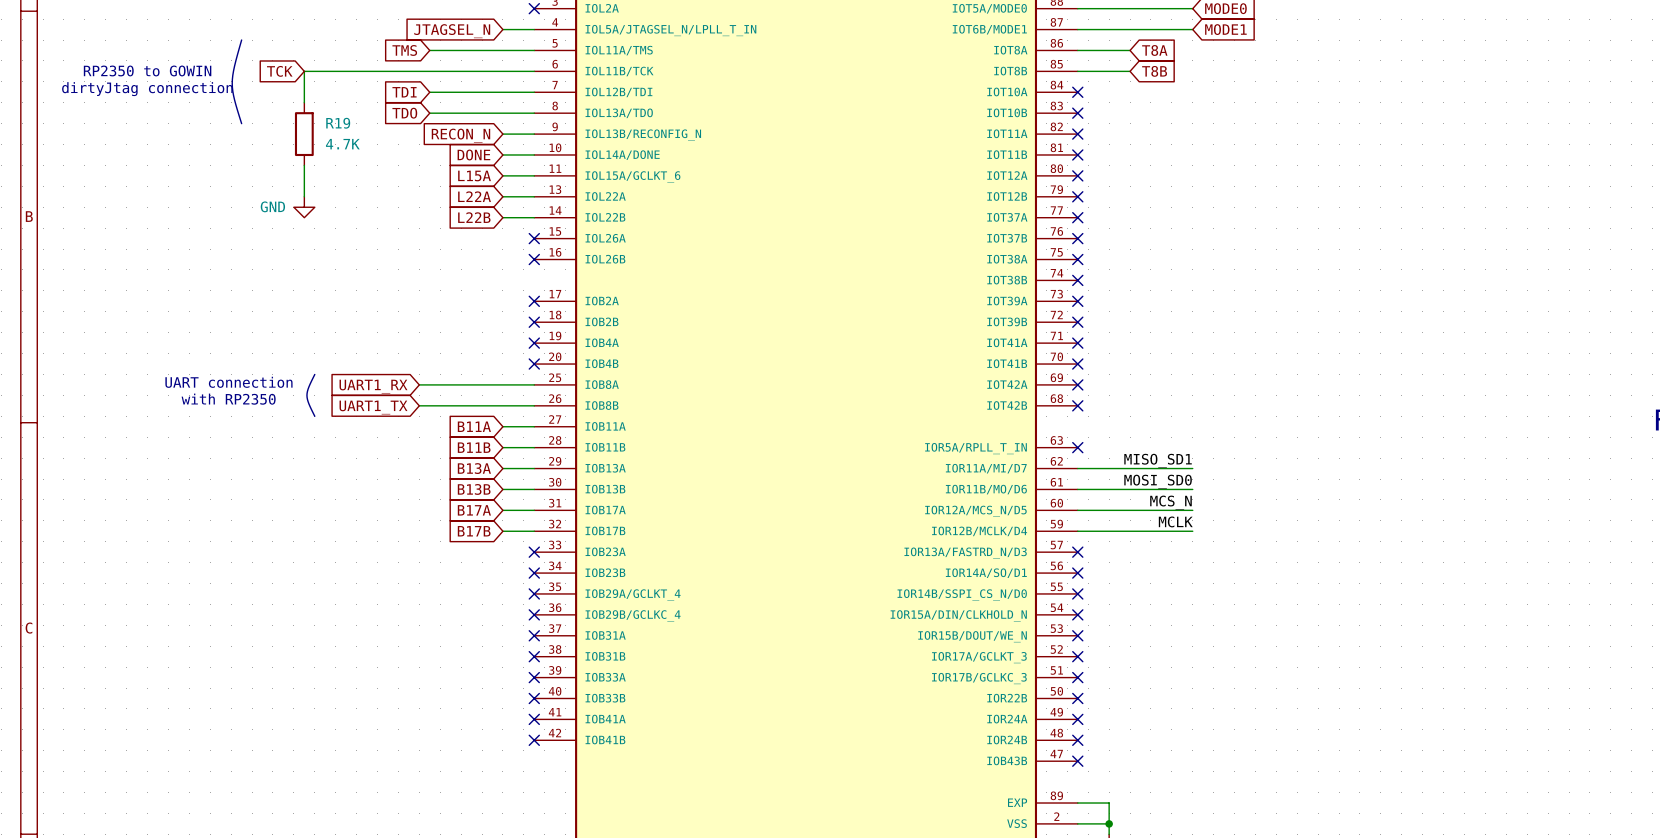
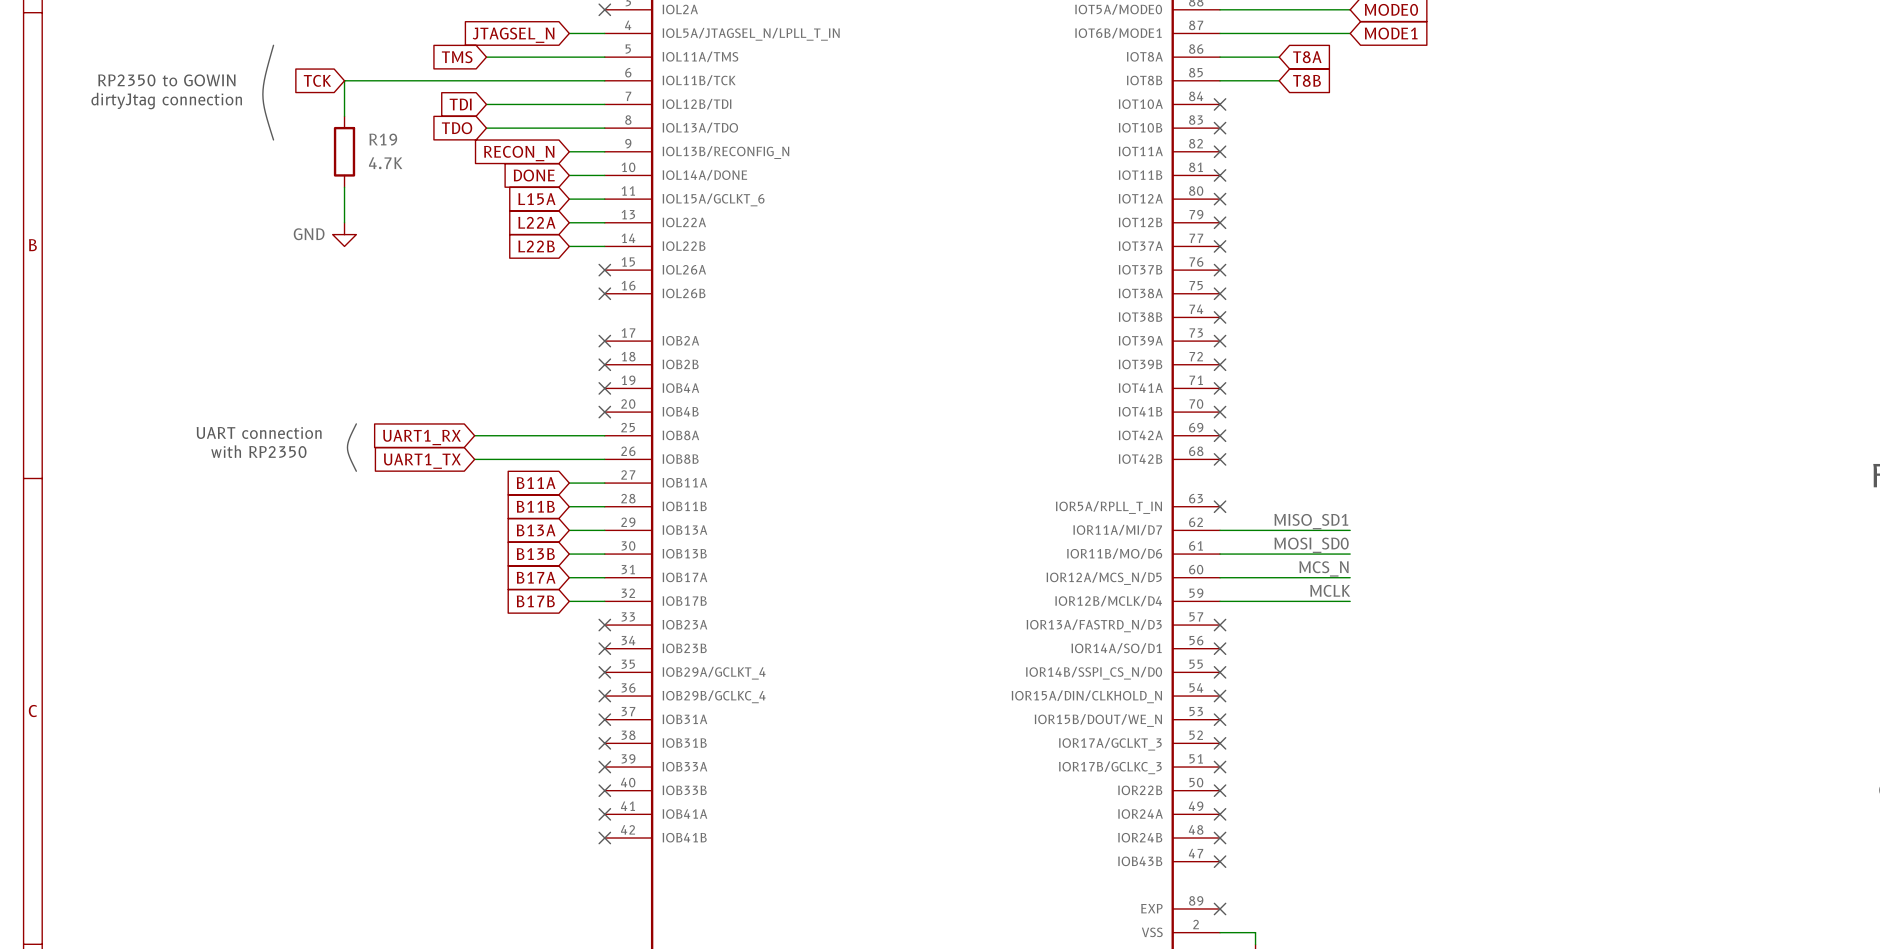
wire: (1077, 803) (1109, 803) (1109, 823) -> none
no-connect mark: none -> (1220, 908)
junction: (1109, 823) -> none

